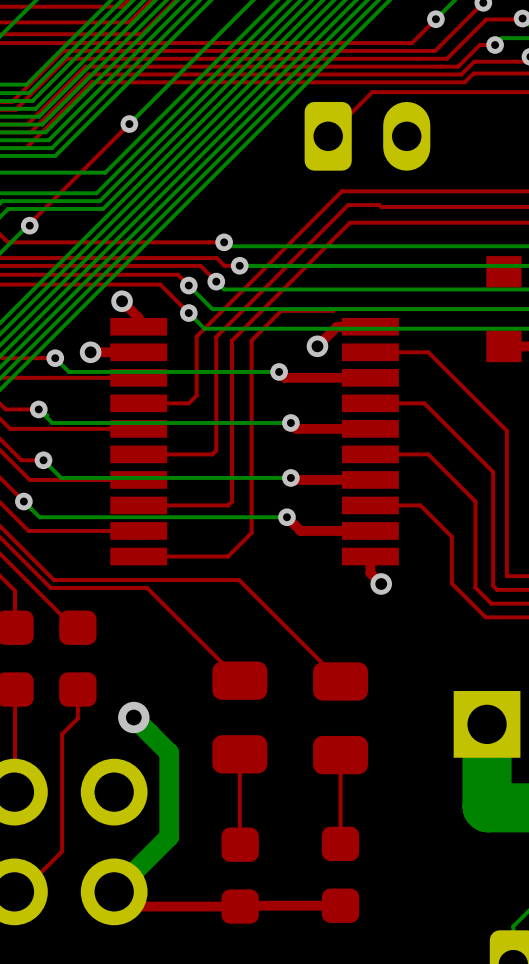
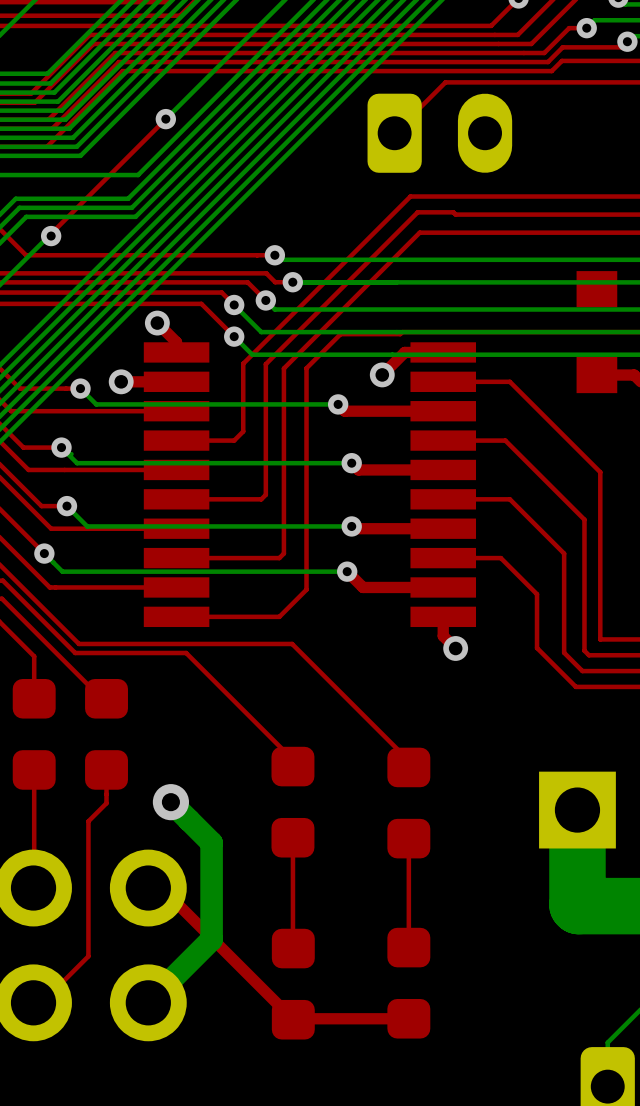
part footprint: [212, 661, 268, 774] -> [271, 746, 315, 858]
part footprint: [313, 662, 369, 775] -> [387, 747, 431, 859]
top track: (240, 906) (128, 906) -> (293, 1019) (161, 888) (148, 888)

